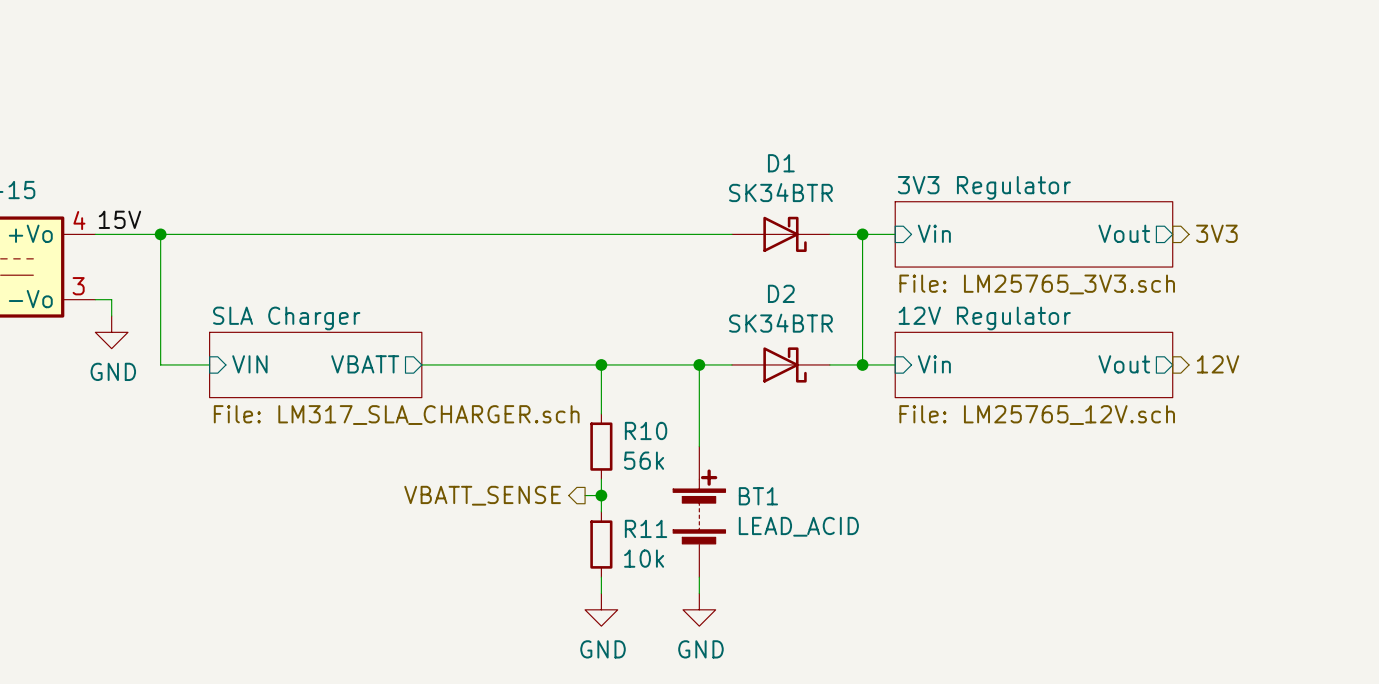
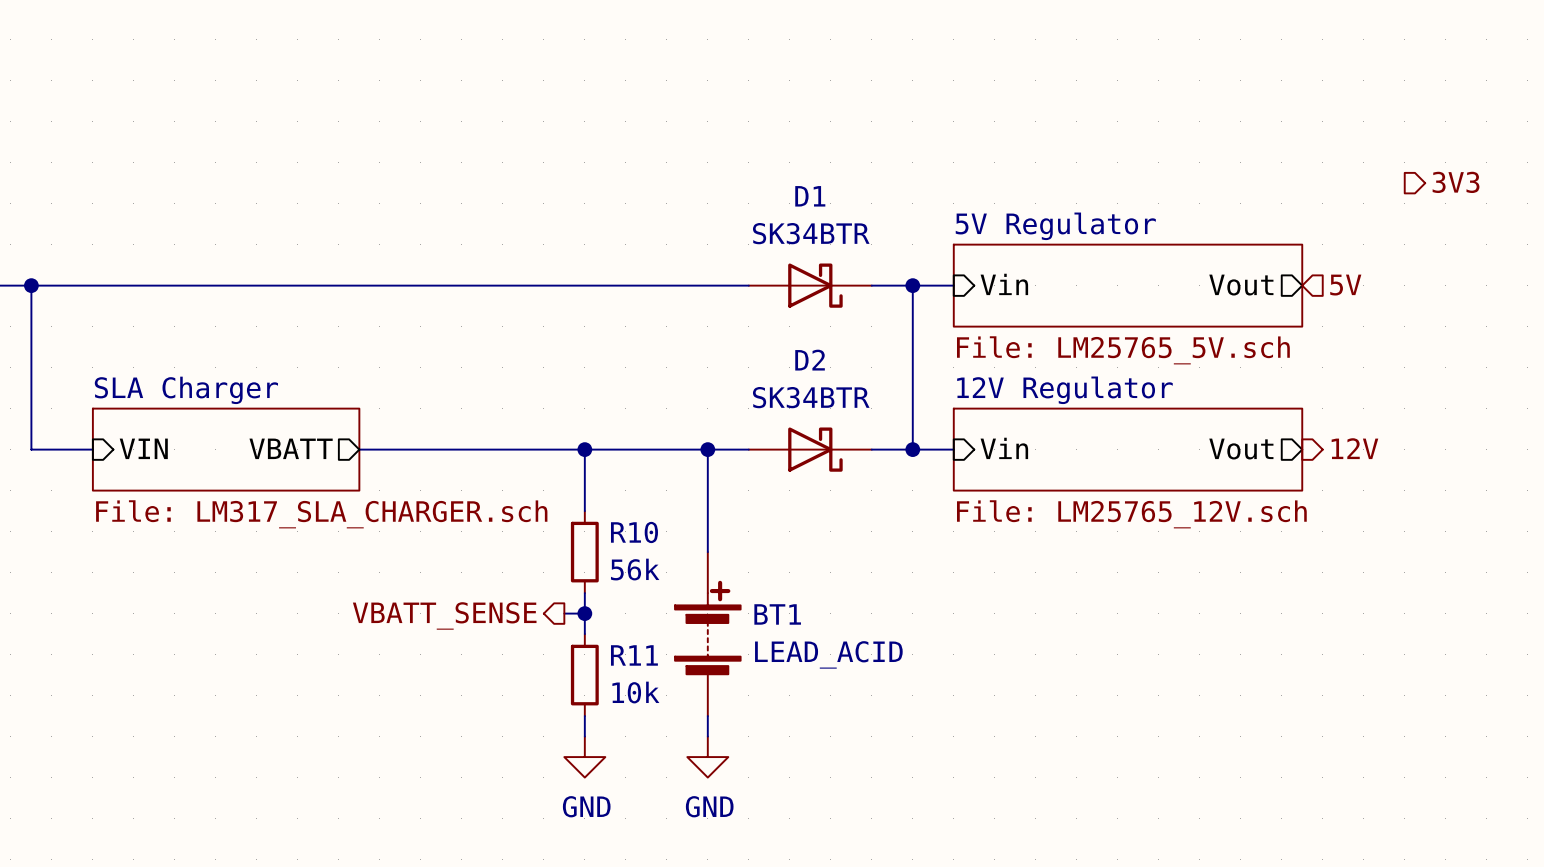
hierarchical label: none -> 3V3 (1456, 182)
sheet 3V3 Regulator name: 3V3 Regulator (984, 187) -> 5V Regulator (1055, 226)
hierarchical label shape: output (1216, 233) -> input (1345, 285)
hierarchical label: 3V3 (1216, 233) -> 5V (1345, 285)
sheet 3V3 Regulator value: File: LM25765_3V3.sch (1037, 284) -> File: LM25765_5V.sch (1123, 350)

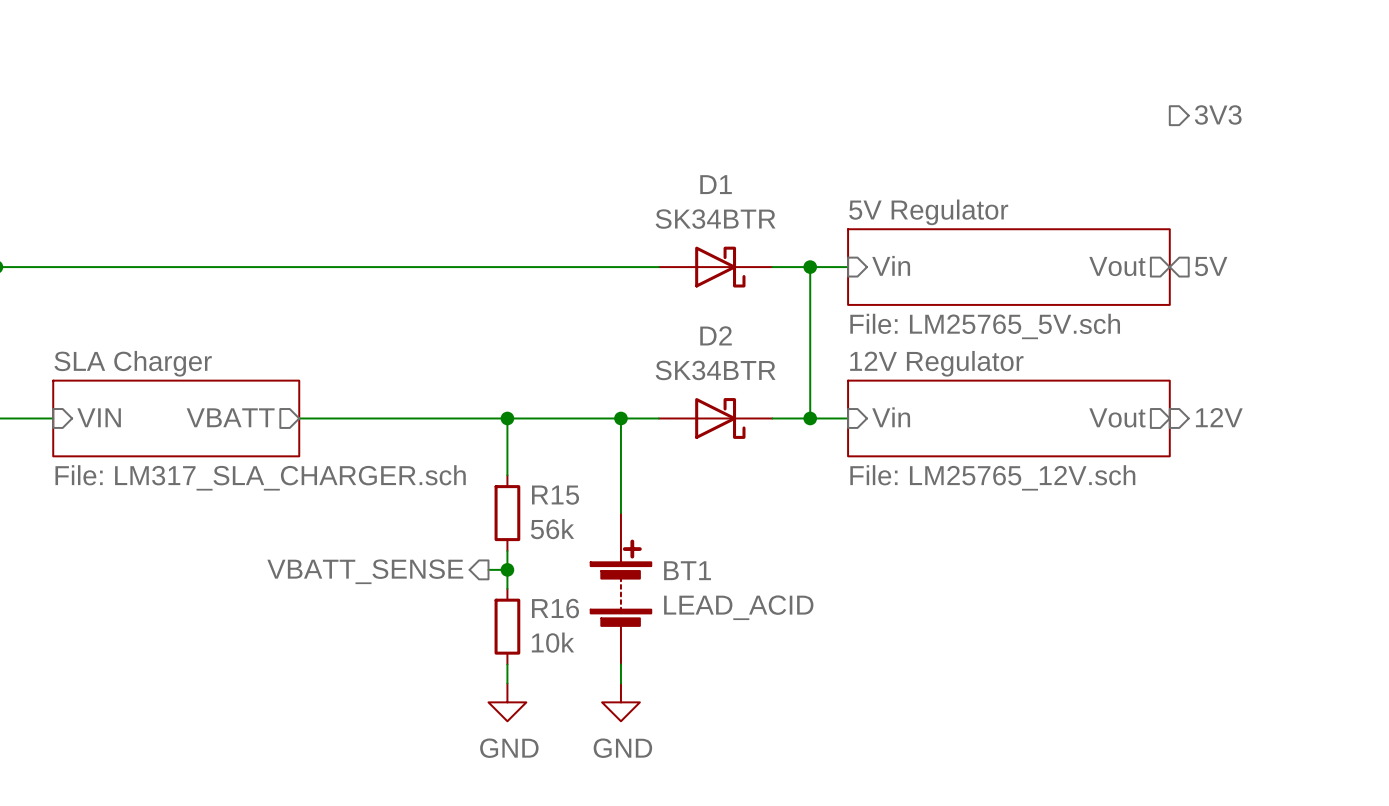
hierarchical label position: 3V3 (1456, 182) -> 3V3 (1218, 114)
R10 name: R10 (634, 532) -> R15 (555, 495)
R11 name: R11 (634, 655) -> R16 (555, 608)

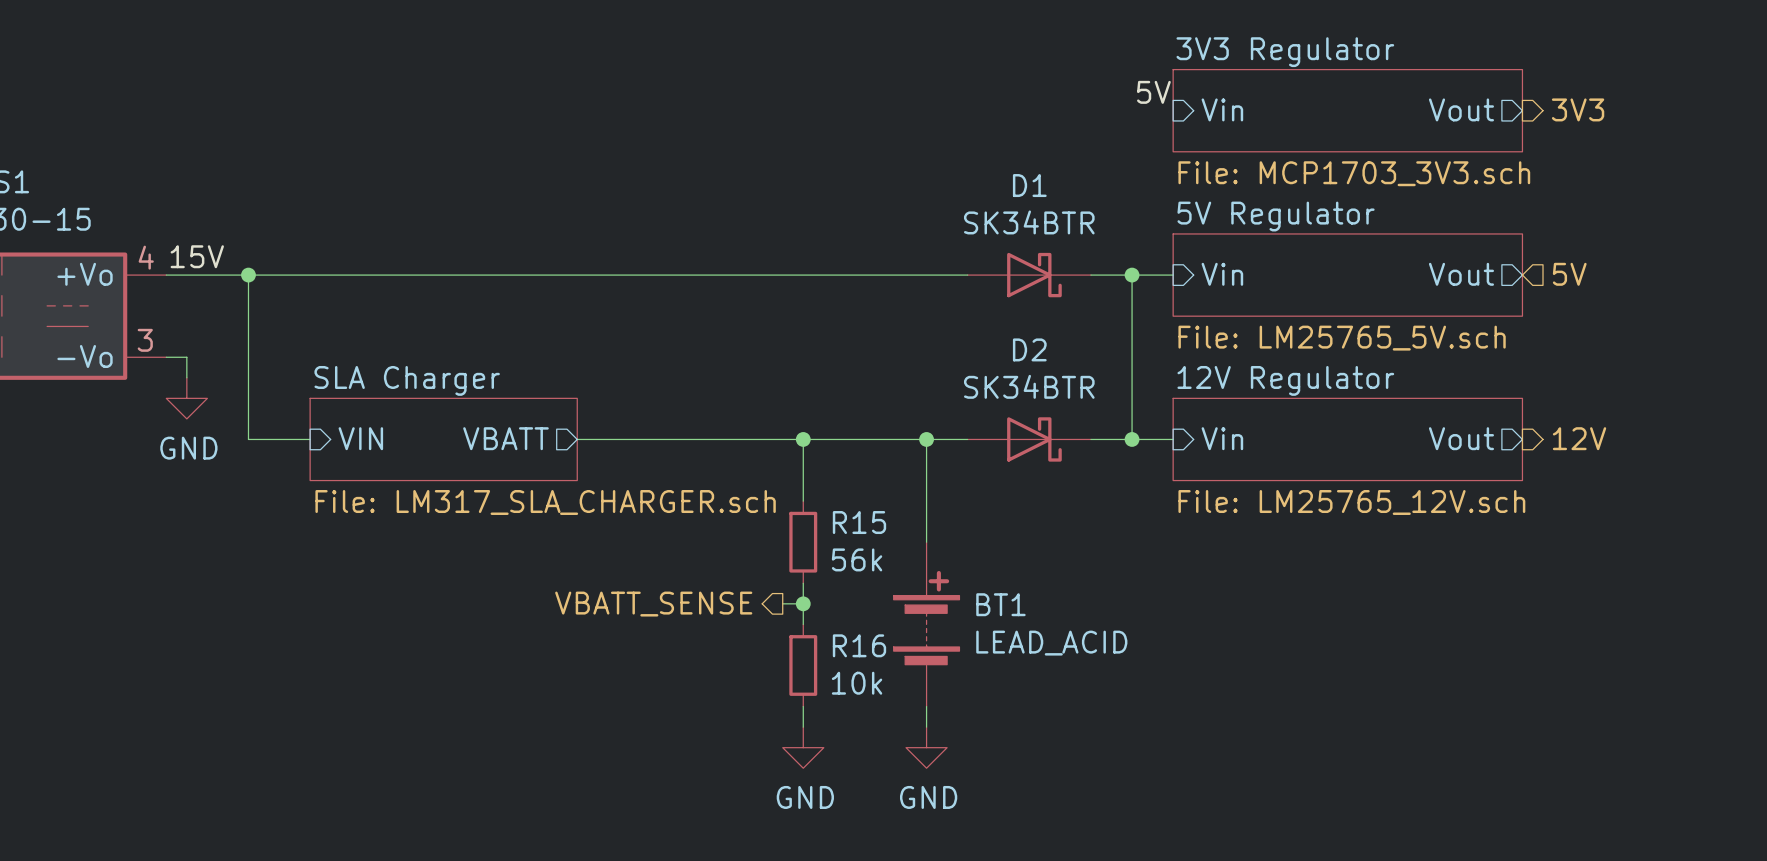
label: none -> 5V (1153, 92)
sheet pin: none -> Vin (1222, 109)
sheet 3V3 Regulator: none -> File: MCP1703_3V3.sch (1347, 110)
sheet pin: none -> Vout (1461, 109)

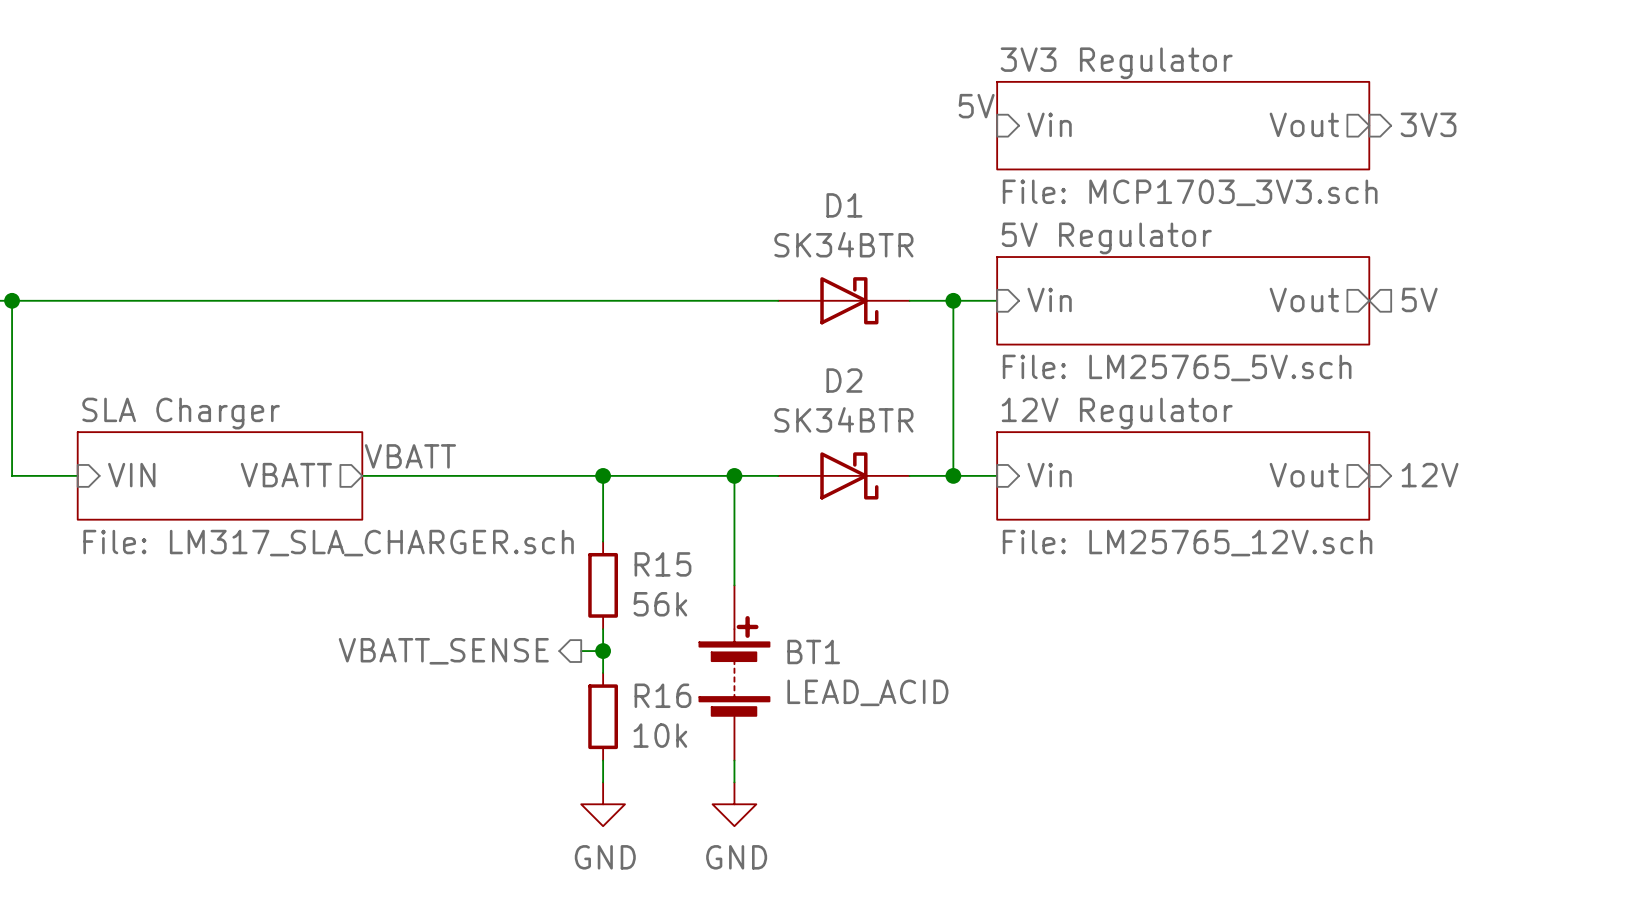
label: none -> VBATT (410, 456)

